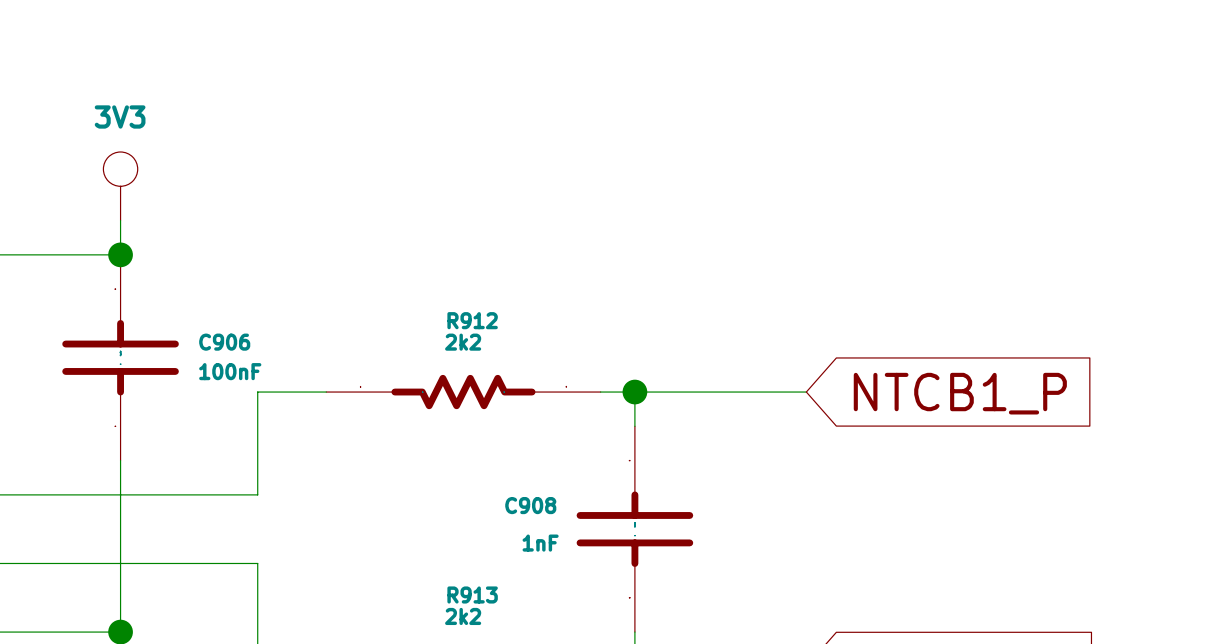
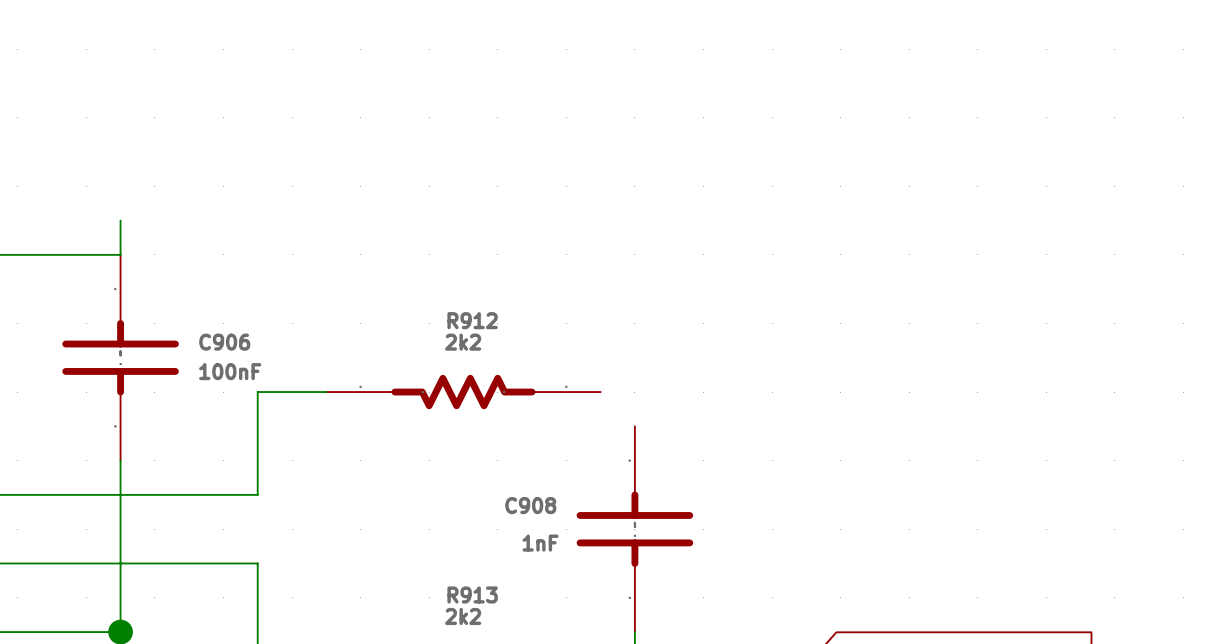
power symbol: 3V3 (120, 186) -> none
junction: (120, 254) -> none
wire: (600, 392) (806, 392) -> none
wire: (634, 392) (634, 426) -> none
junction: (634, 392) -> none
global label: NTCB1_P (960, 393) -> none

